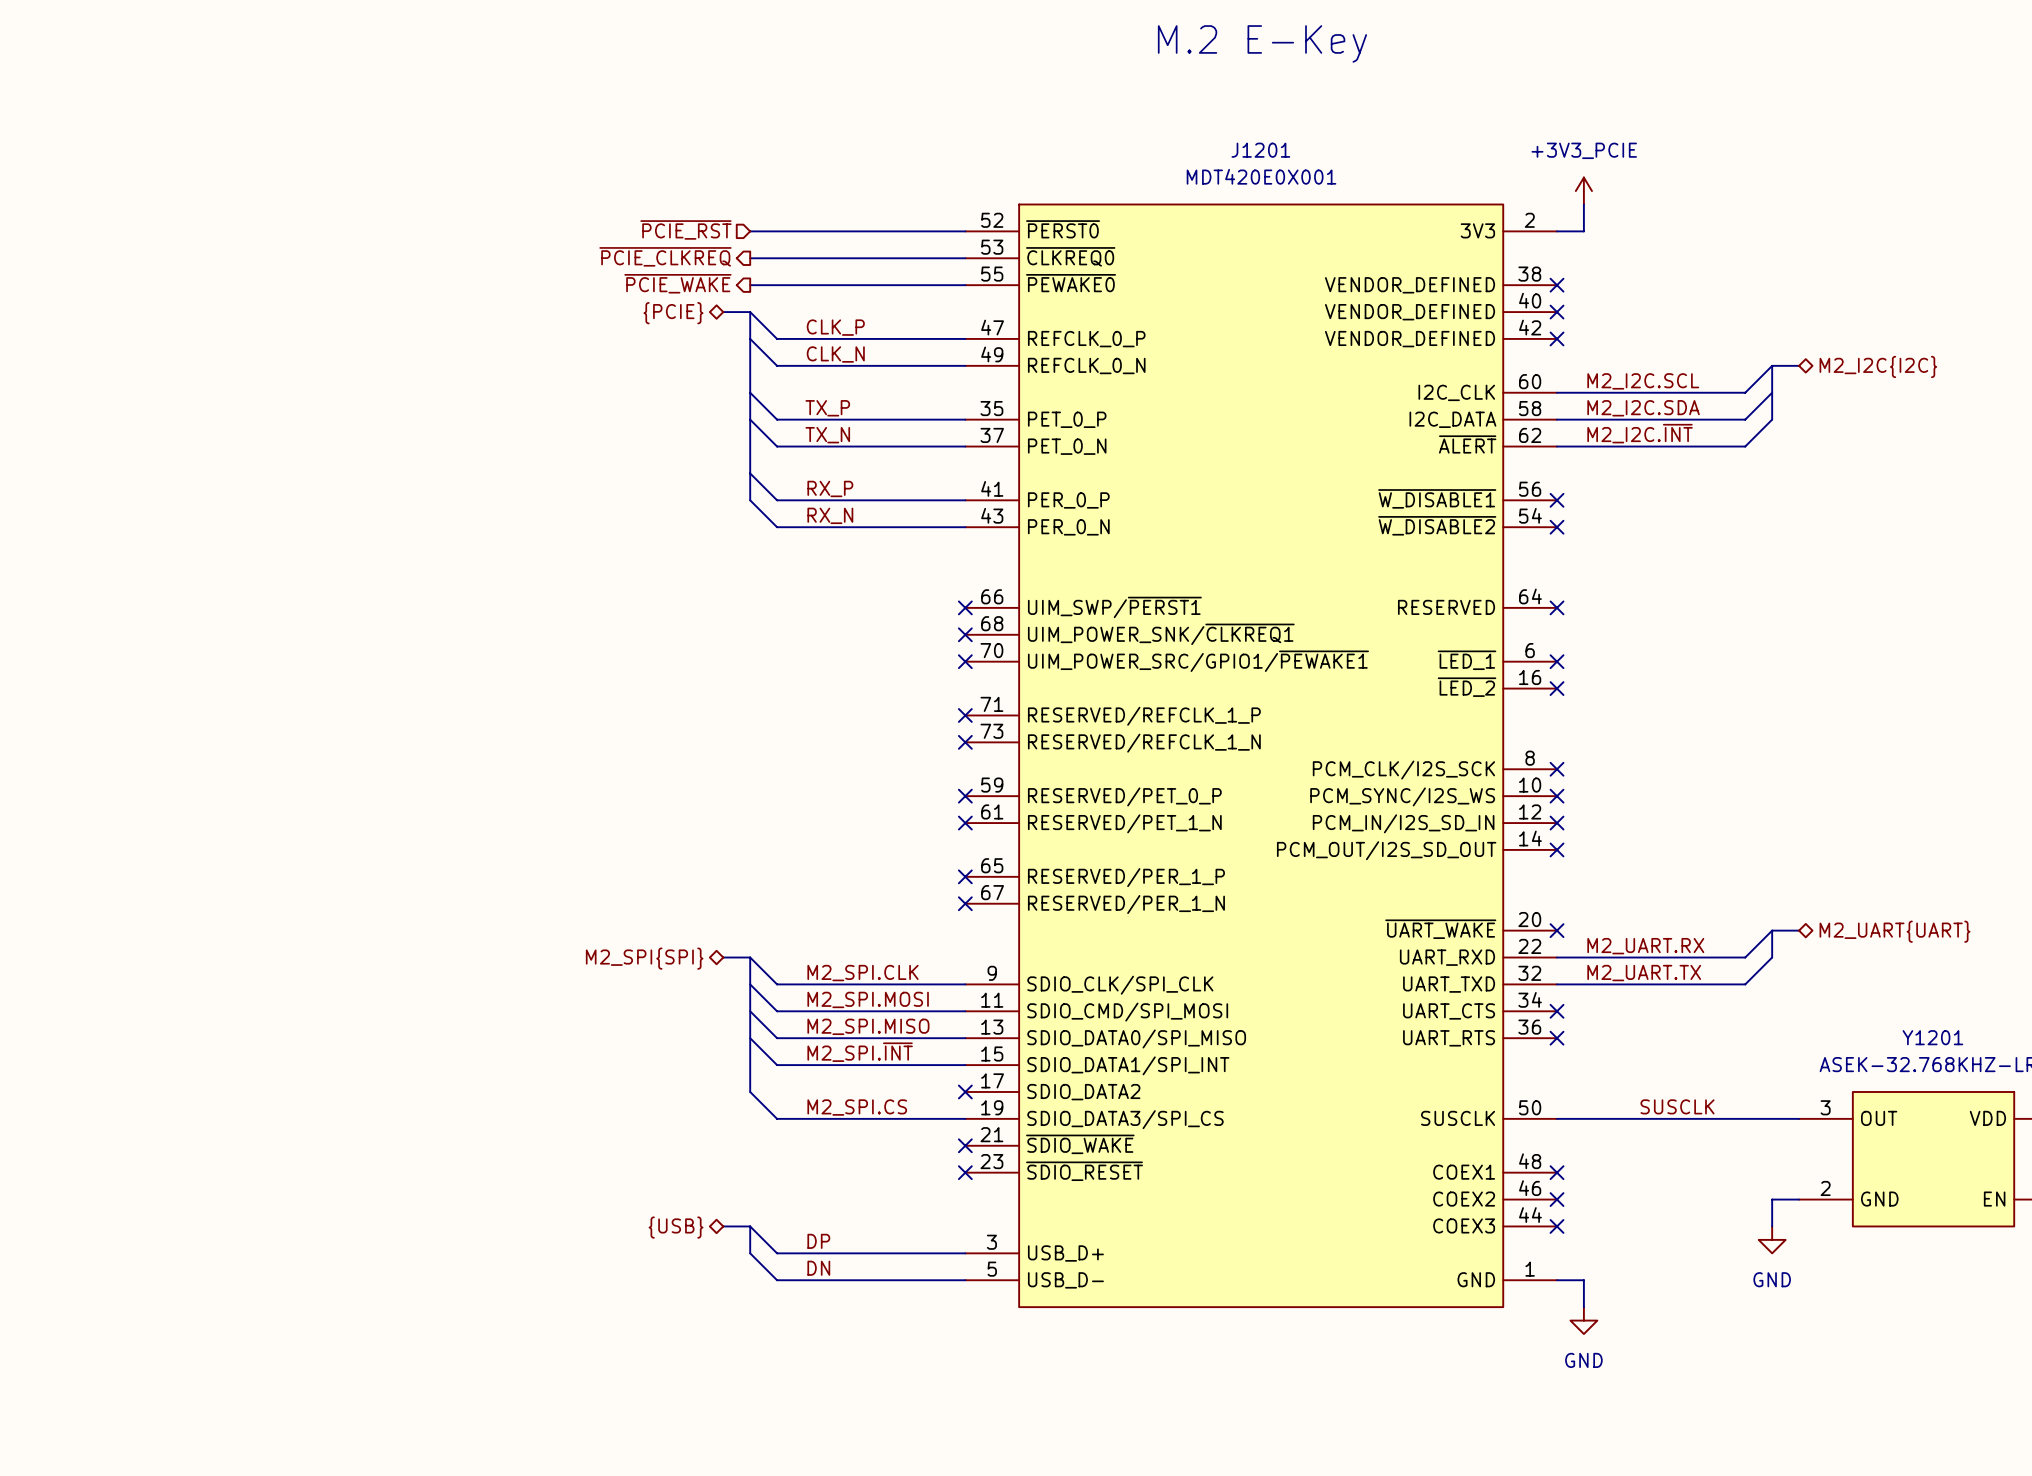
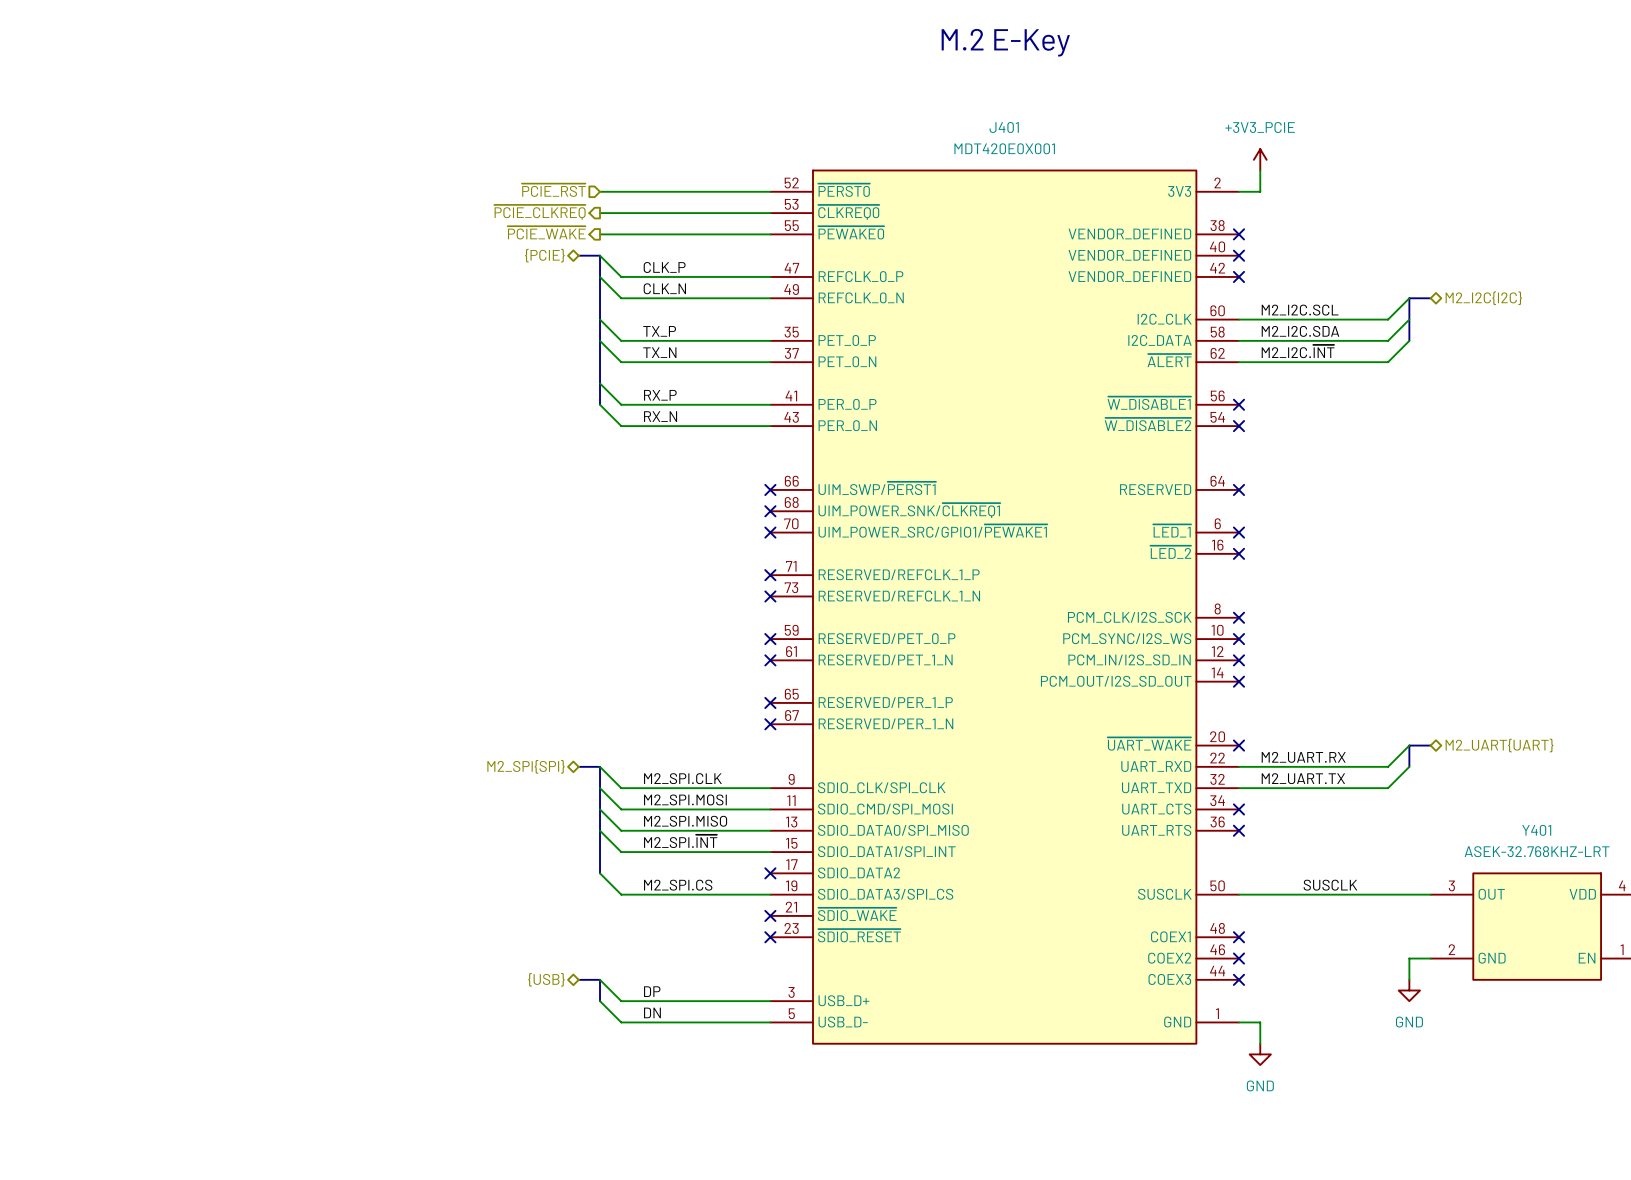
J1201 name: J1201 (1260, 150) -> J401 (1004, 127)
Y1201 name: Y1201 (1932, 1037) -> Y401 (1536, 830)

